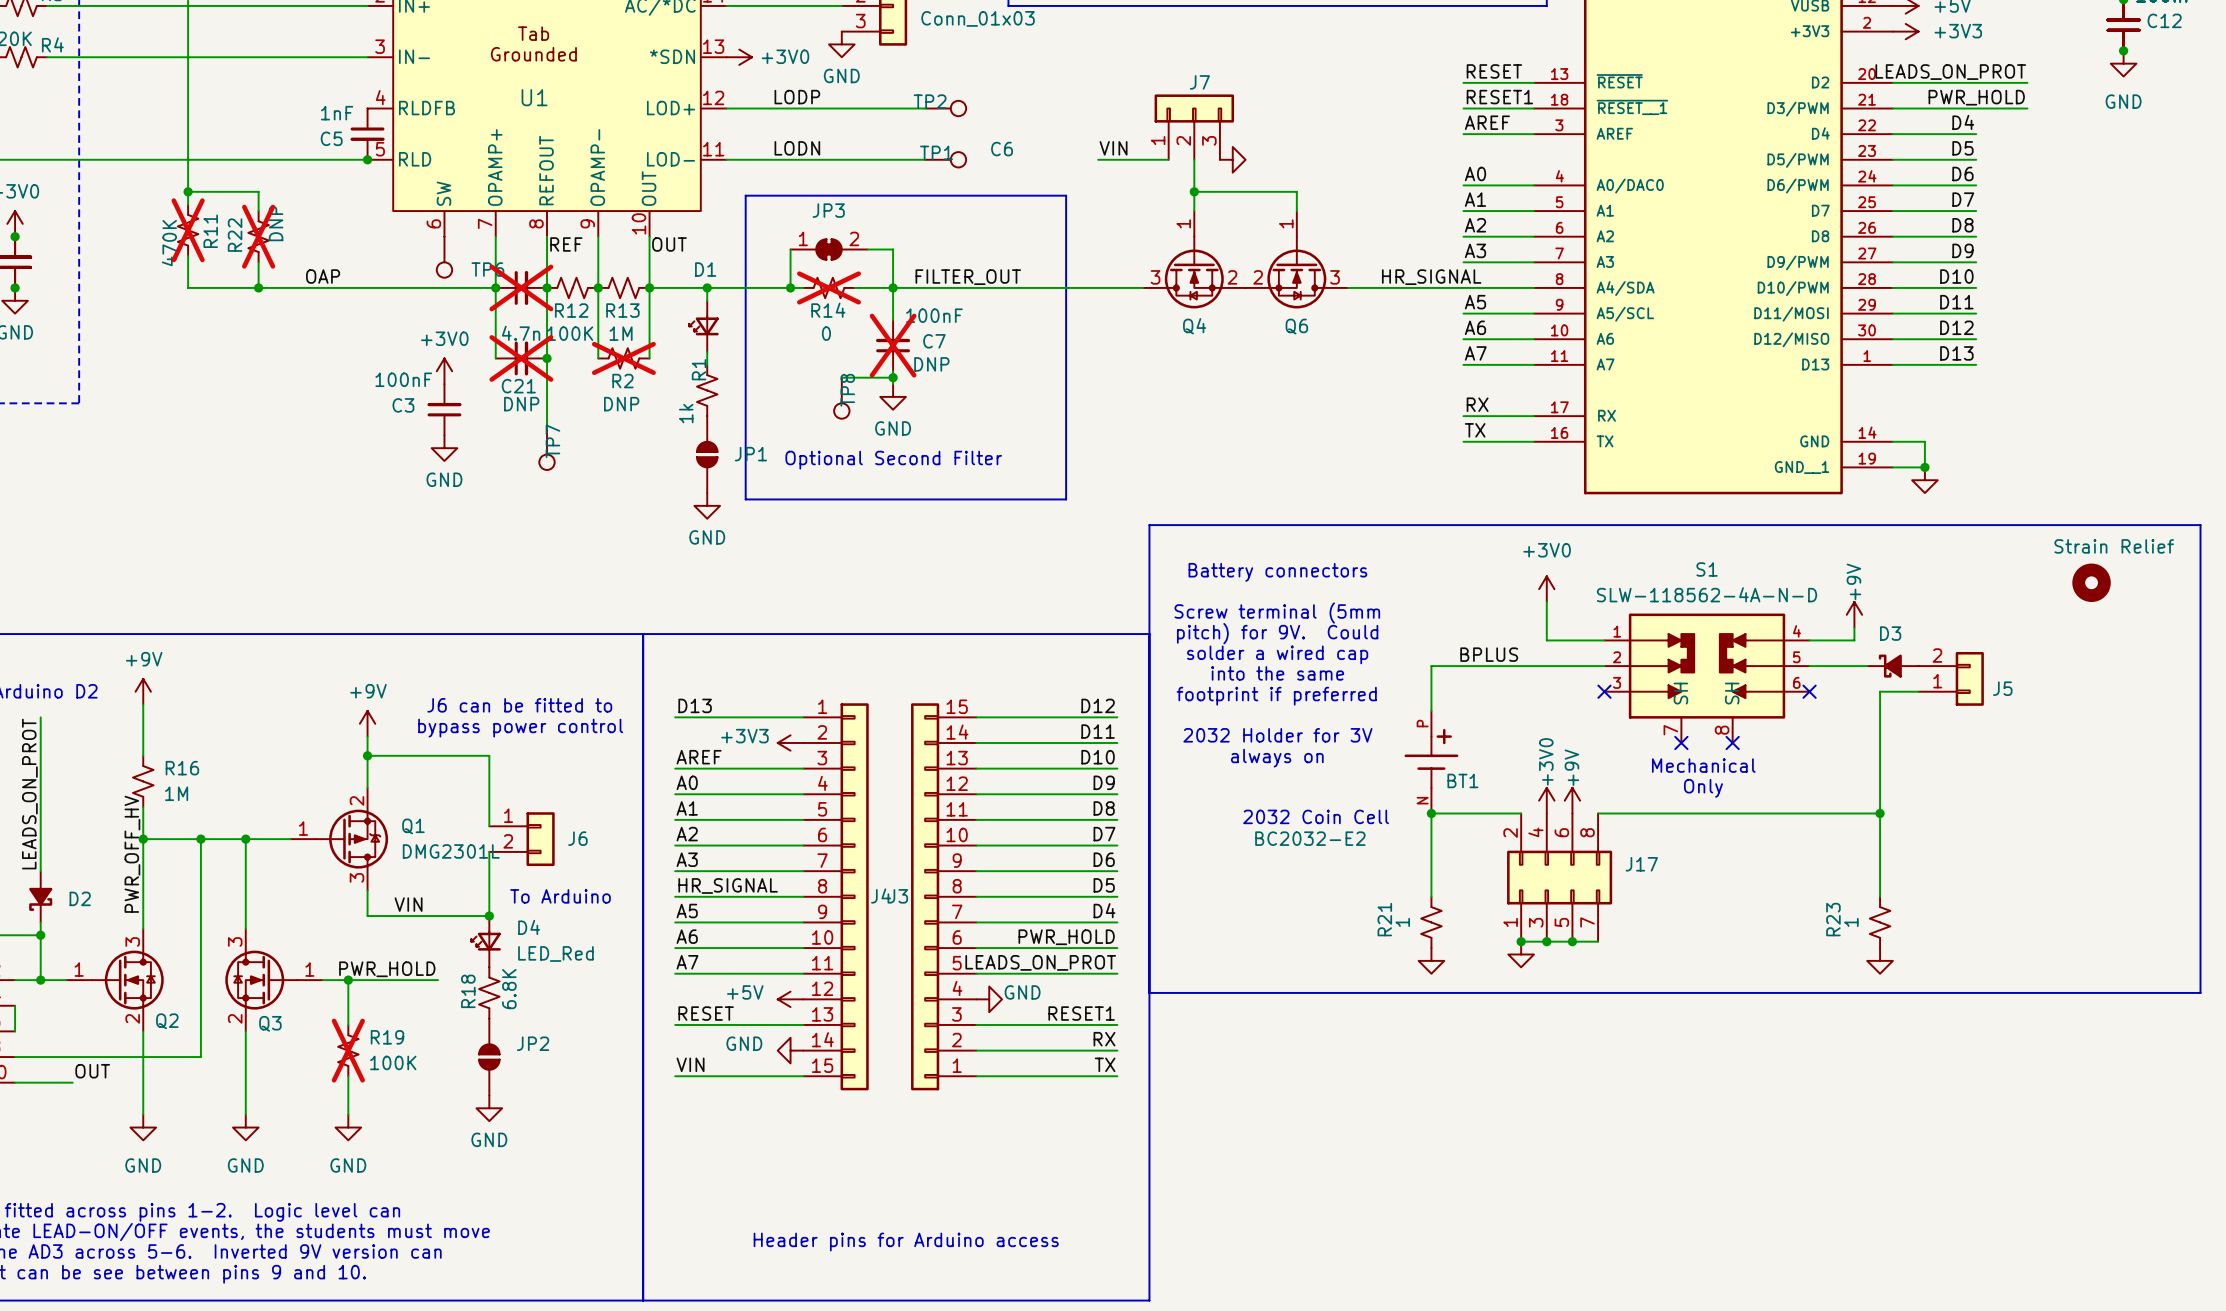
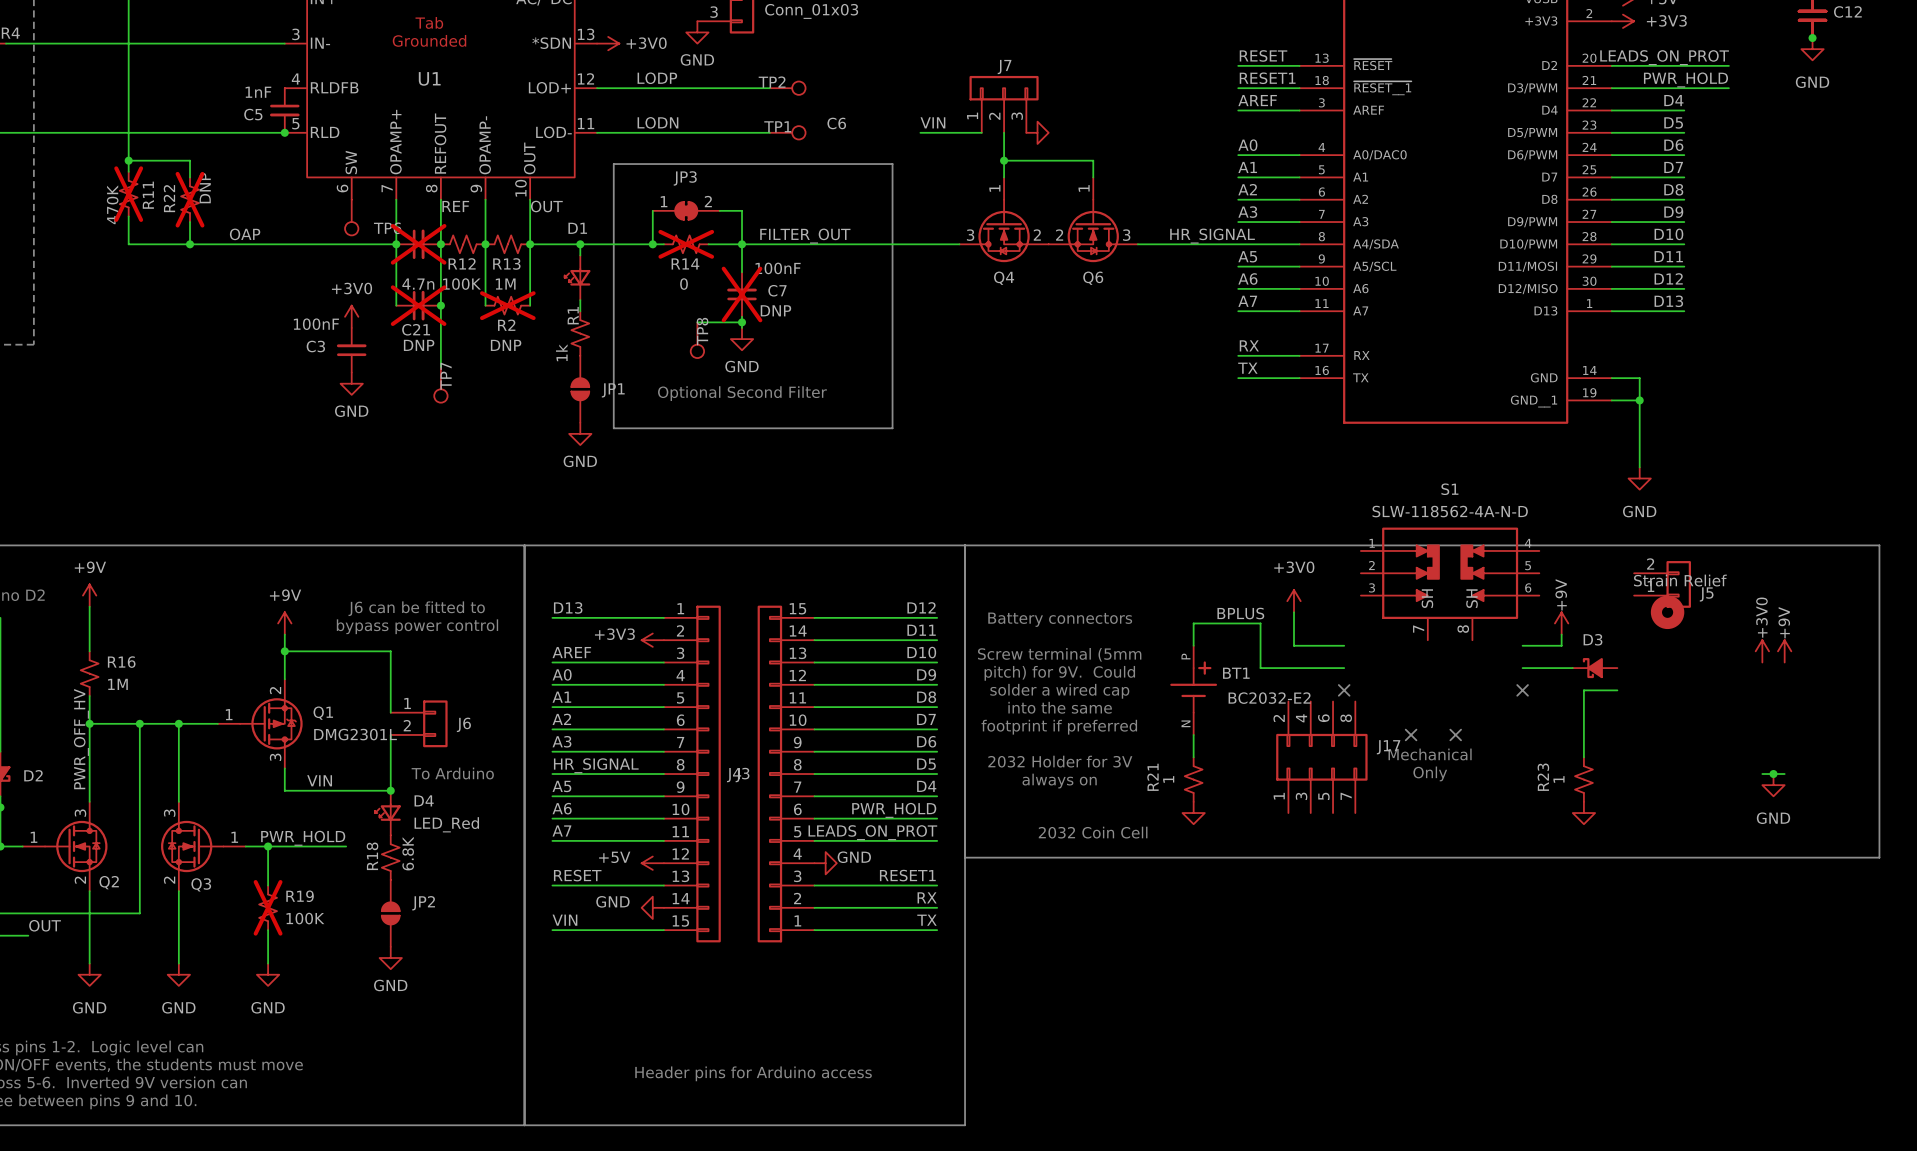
wire: none -> (1639, 400) (1639, 467)
power symbol: (1924, 480) -> none
power symbol: none -> GND (1639, 478)
text position: Battery connectors (1277, 572) -> Battery connectors (1060, 619)
part position: (2091, 582) -> (1667, 612)
power symbol: +3V0 (1546, 589) -> none
wire: (1546, 602) (1546, 640) (1604, 640) -> (1294, 612) (1294, 645) (1344, 645)
text position: Screw terminal (5mm (1277, 613) -> Screw terminal (5mm (1059, 654)
power symbol position: +9V (1854, 614) -> +9V (1561, 623)
wire: (1854, 627) (1854, 640) (1809, 640) -> (1561, 634) (1561, 645) (1522, 645)
text position: pitch) for 9V. Could (1277, 633) -> pitch) for 9V. Could (1059, 673)
line: (1149, 634) (1149, 525) (2200, 525) (2200, 634) -> (965, 545) (1879, 545)
text position: solder a wired cap (1277, 654) -> solder a wired cap (1059, 691)
label position: BPLUS (1489, 654) -> BPLUS (1240, 613)
wire: (1604, 666) (1431, 666) (1431, 710) -> none
wire: (1809, 666) (1867, 666) -> (1522, 668) (1572, 668)
D3 position: (1892, 666) -> (1595, 668)
text position: into the same (1277, 673) -> into the same (1060, 707)
no-connect mark: (1604, 691) -> none
no-connect mark: (1809, 691) -> none
wire: (1918, 691) (1880, 691) (1880, 896) -> none
text position: footprint if preferred (1276, 696) -> footprint if preferred (1059, 727)
power symbol: none -> +3V0 (1294, 601)
text position: 2032 Holder for 3V (1277, 735) -> 2032 Holder for 3V (1060, 761)
no-connect mark: (1681, 742) -> none
no-connect mark: (1732, 742) -> none
wire: none -> (1193, 645) (1193, 623) (1260, 623) (1260, 668) (1344, 668)
power symbol: none -> +3V0 (1762, 651)
power symbol: none -> +9V (1784, 651)
text position: always on (1277, 758) -> always on (1059, 781)
BT1 position: (1431, 762) -> (1193, 690)
text position: Mechanical (1703, 765) -> Mechanical (1430, 754)
text position: Only (1703, 788) -> Only (1430, 773)
power symbol: +3V0 (1546, 800) -> none
power symbol: +9V (1572, 800) -> none
no-connect mark: none -> (1344, 690)
no-connect mark: none -> (1522, 690)
wire: none -> (1617, 690) (1583, 690) (1583, 757)
junction: (1431, 813) -> none
wire: (1521, 813) (1431, 813) (1431, 896) -> none
wire: (1598, 813) (1880, 813) -> none
junction: (1880, 813) -> none
text position: 2032 Coin Cell (1316, 816) -> 2032 Coin Cell (1093, 832)
BT1 value position: BC2032-E2 (1310, 838) -> BC2032-E2 (1269, 698)
wire: none -> (1193, 734) (1193, 757)
no-connect mark: none -> (1411, 734)
no-connect mark: none -> (1455, 734)
wire: none -> (1762, 774) (1784, 774)
junction: none -> (1773, 774)
power symbol: none -> GND (1773, 785)
R21 position: (1431, 922) -> (1193, 779)
R23 position: (1880, 922) -> (1583, 779)
wire: (1521, 941) (1598, 941) -> none
junction: (1521, 941) -> none
junction: (1546, 941) -> none
junction: (1572, 941) -> none
power symbol: (1521, 954) -> none
power symbol position: (1431, 960) -> (1193, 813)
power symbol position: (1880, 960) -> (1583, 813)

